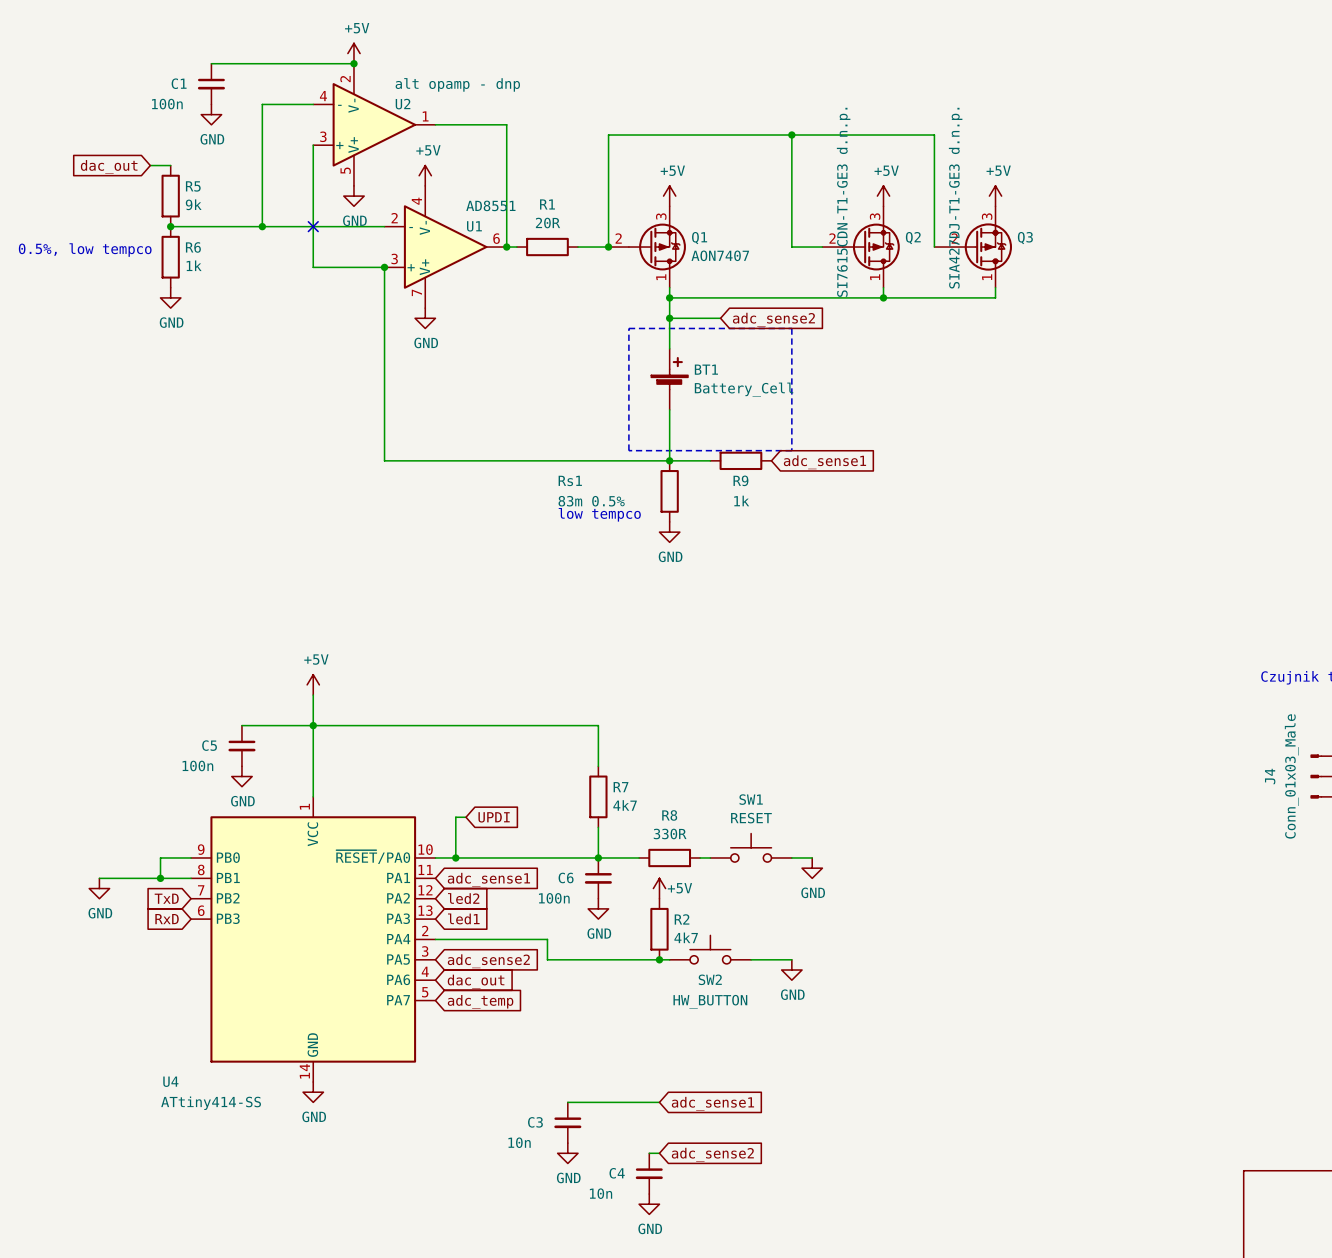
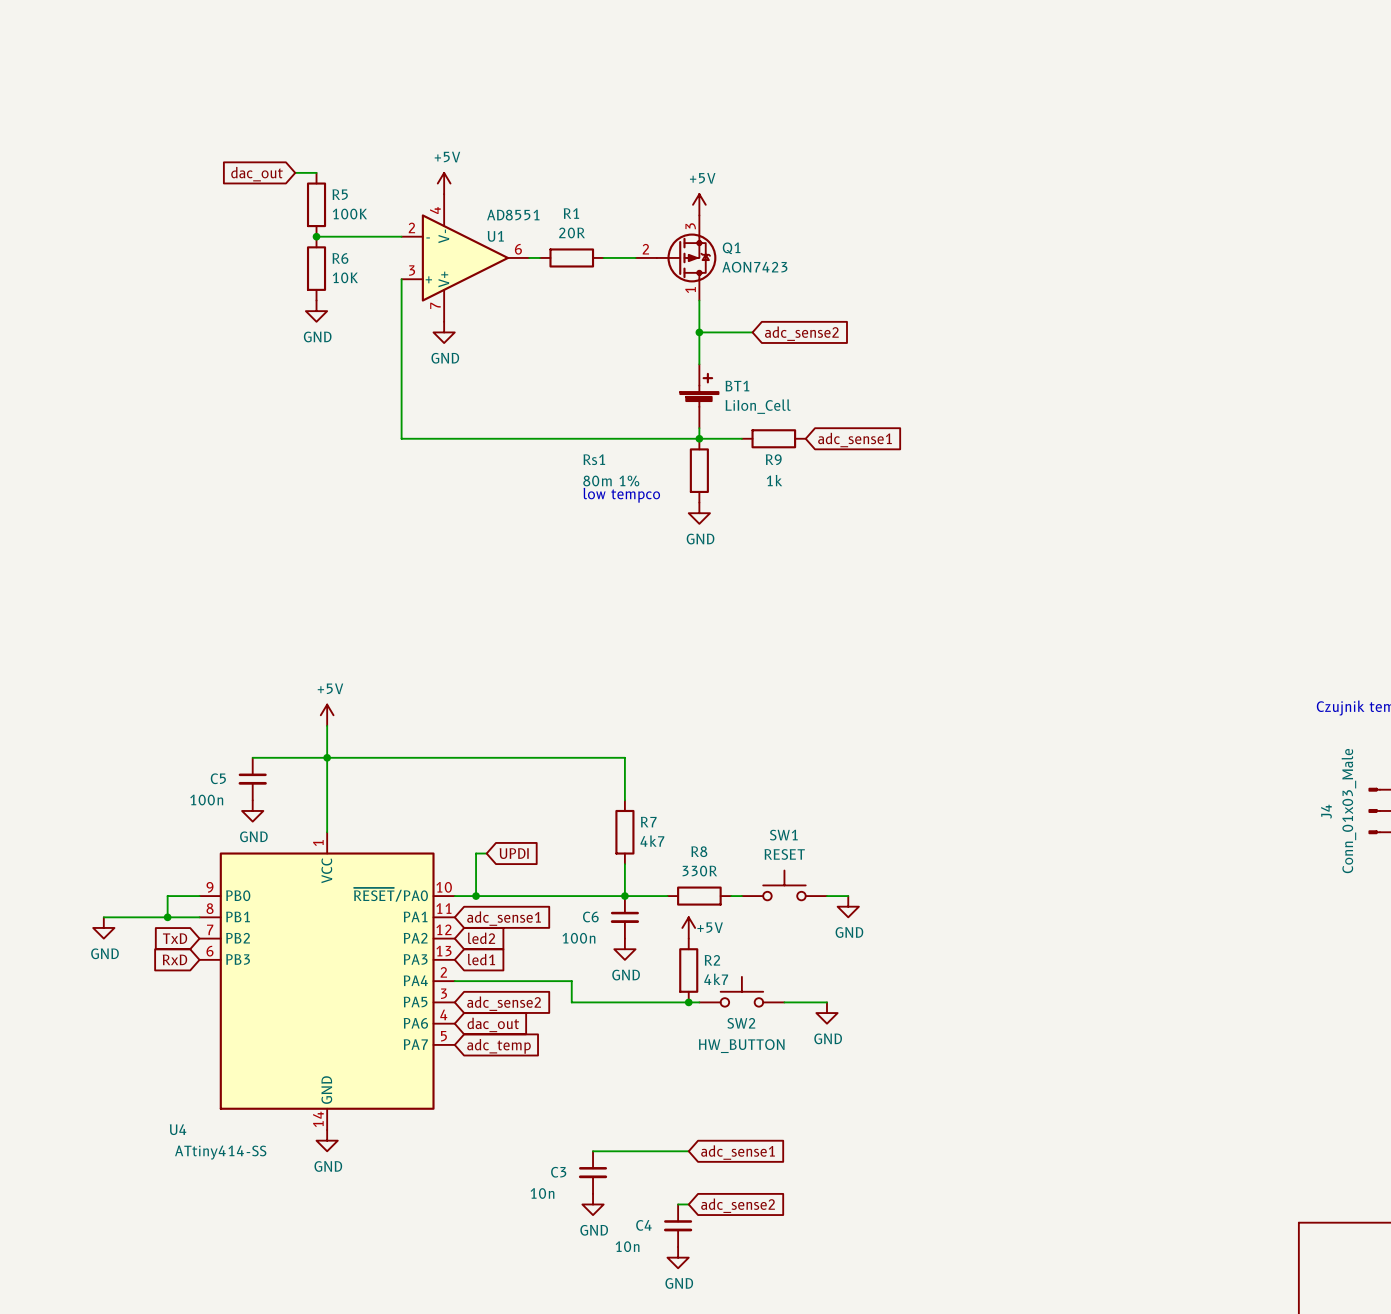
power symbol: +5V (353, 53) -> none
wire: (211, 63) (353, 63) -> none
junction: (353, 63) -> none
C1: 100n (211, 84) -> none
wire: (313, 104) (262, 104) (262, 226) -> none
power symbol: GND (211, 114) -> none
U2: alt opamp - dnp (374, 124) -> none
wire: (435, 124) (506, 124) (506, 247) -> none
wire: (791, 135) (791, 247) (822, 247) -> none
junction: (791, 135) -> none
wire: (313, 145) (313, 267) (384, 267) -> none
wire: (150, 165) (170, 165) -> (295, 172) (316, 172)
global label position: dac_out (109, 166) -> dac_out (257, 174)
R5 position: (170, 196) -> (316, 204)
power symbol: GND (353, 196) -> none
power symbol: +5V (883, 196) -> none
power symbol: +5V (995, 196) -> none
R5 value: 9k (193, 204) -> 100K (349, 214)
wire: (170, 226) (303, 226) -> none
junction: (170, 226) -> none
junction position: (262, 226) -> (316, 236)
no-connect mark: (313, 226) -> none
junction: (506, 247) -> none
wire: (608, 247) (608, 135) (934, 135) (934, 247) -> none
junction: (608, 247) -> none
Q2: SI7615CDN-T1-GE3 d.n.p. (861, 247) -> none
Q3: SIA427DJ-T1-GE3 d.n.p. (973, 247) -> none
text: 0.5%, low tempco (85, 250) -> none
Q1 value: AON7407 (720, 255) -> AON7423 (754, 267)
R6 position: (170, 257) -> (316, 268)
R6 value: 1k (194, 265) -> 10K (345, 277)
junction: (384, 267) -> none
wire: (883, 287) (883, 297) -> none
wire: (995, 287) (995, 297) (669, 297) -> none
power symbol: GND (170, 297) -> none
power symbol: none -> GND (316, 311)
junction: (669, 297) -> none
junction: (883, 297) -> none
line: (628, 328) (791, 328) (791, 450) (628, 450) (628, 328) -> none
BT1 value: Battery_Cell (744, 389) -> LiIon_Cell (758, 406)
wire: (384, 420) (384, 460) (710, 460) -> (401, 438) (741, 438)
wire: (669, 420) (669, 460) -> none
junction position: (669, 460) -> (699, 438)
R9 position: (740, 460) -> (773, 438)
global label position: adc_sense1 (824, 462) -> adc_sense1 (855, 440)
Rs1 position: (669, 491) -> (699, 470)
Rs1 value: 83m 0.5% (591, 501) -> 80m 1% (611, 480)
text position: low tempco (599, 514) -> low tempco (621, 495)
power symbol position: GND (669, 532) -> GND (699, 513)

